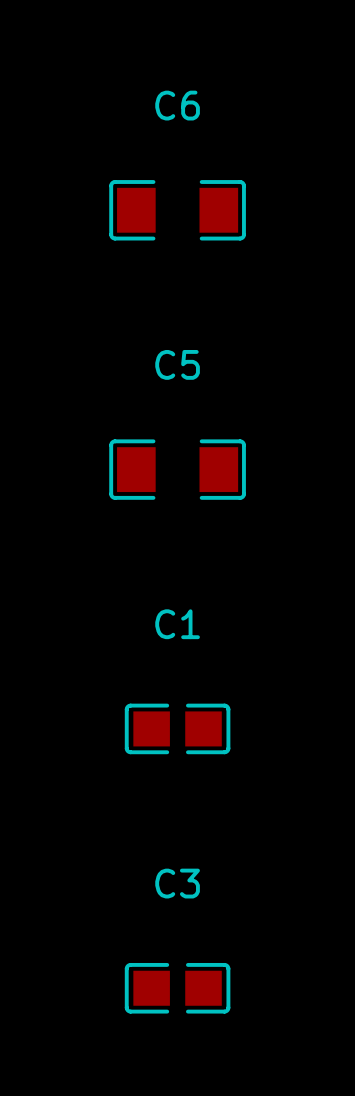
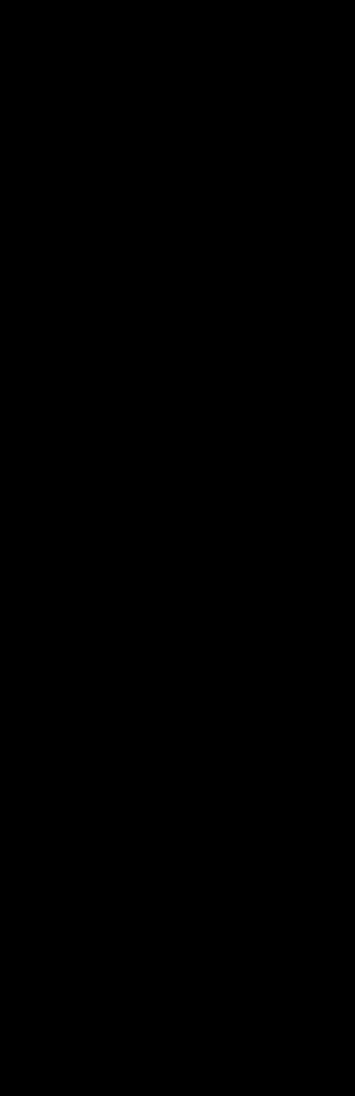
C6: (177, 210) -> none
C5: (177, 469) -> none
C1: (177, 728) -> none
C3: (177, 988) -> none

